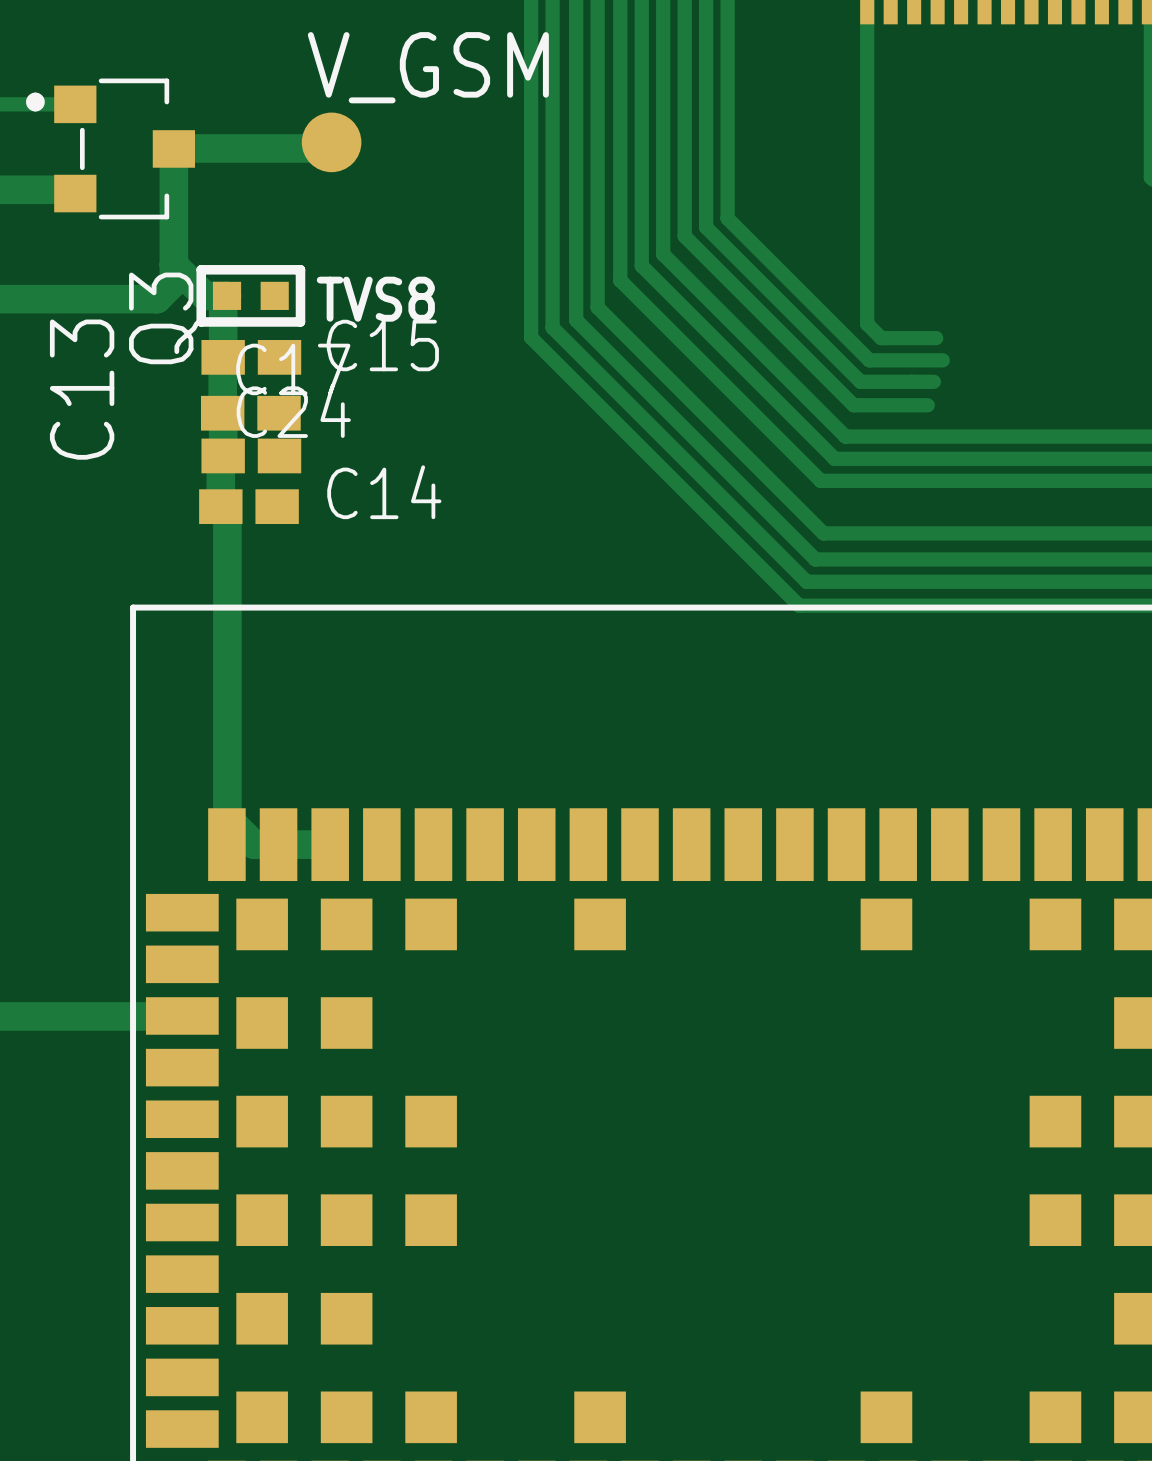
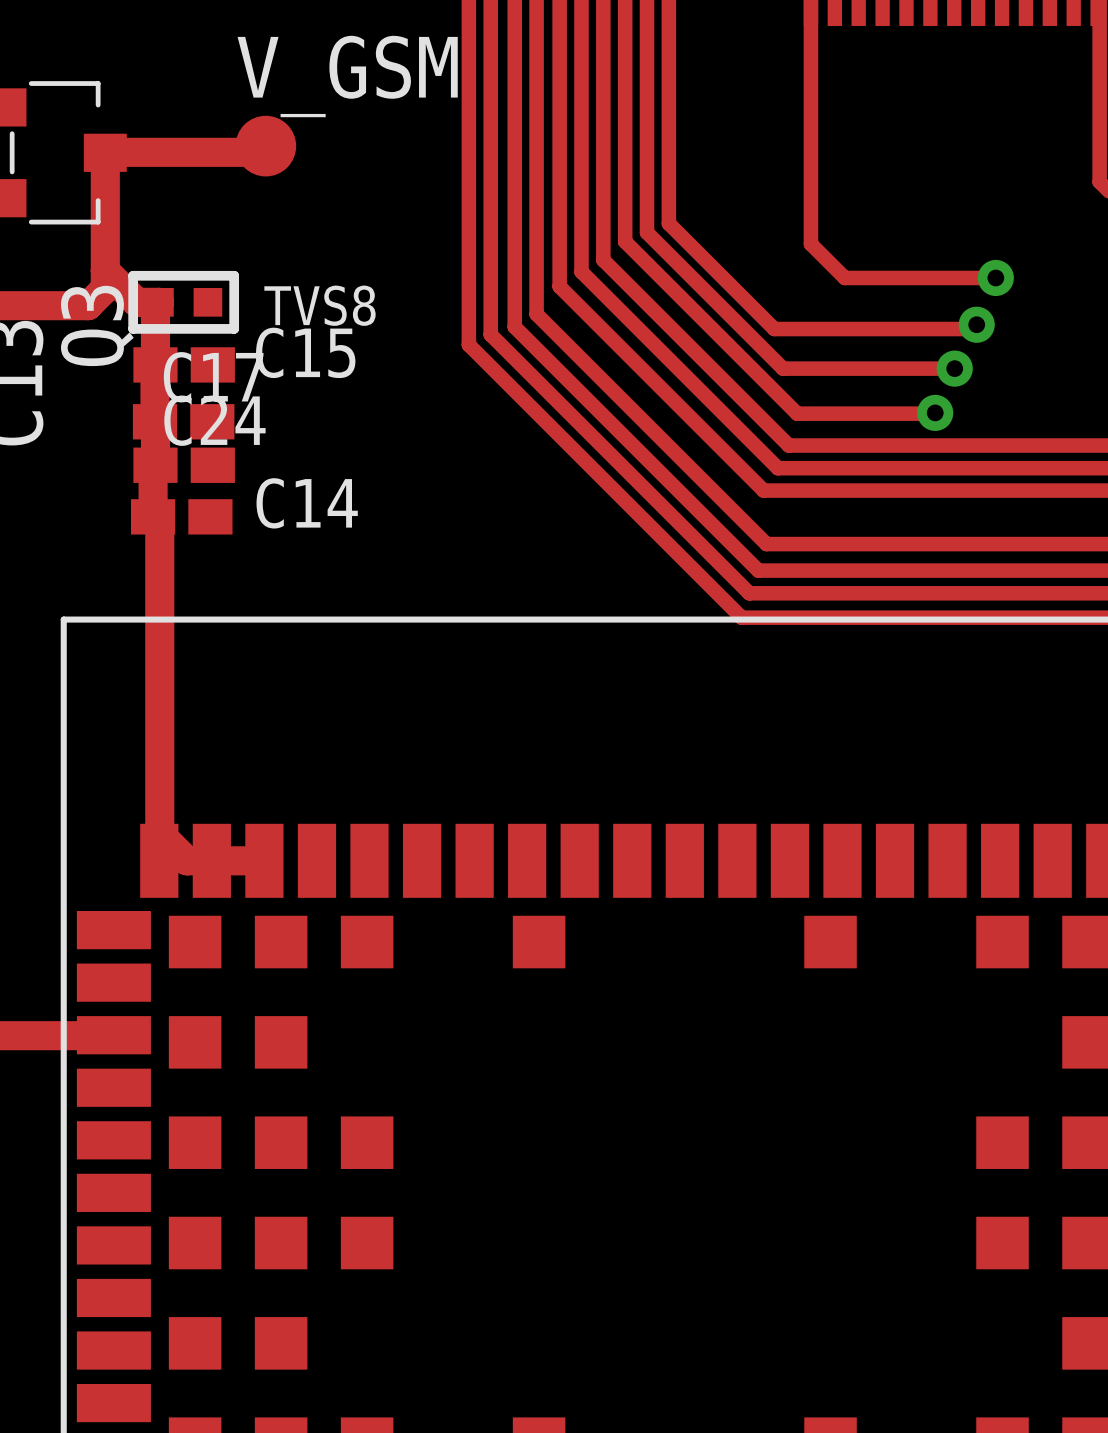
track: (867, 238) (867, 324) (881, 338) (936, 338) -> (810, 244) (844, 277) (995, 277)
via: none -> (995, 277)
via: none -> (976, 324)
track: (831, 322) (869, 360) (942, 360) -> (774, 329) (972, 329) (976, 324)
track: (839, 361) (860, 381) (933, 381) -> (783, 368) (954, 368)
via: none -> (954, 368)
track: none -> (935, 412) (872, 413)
via: none -> (935, 412)

